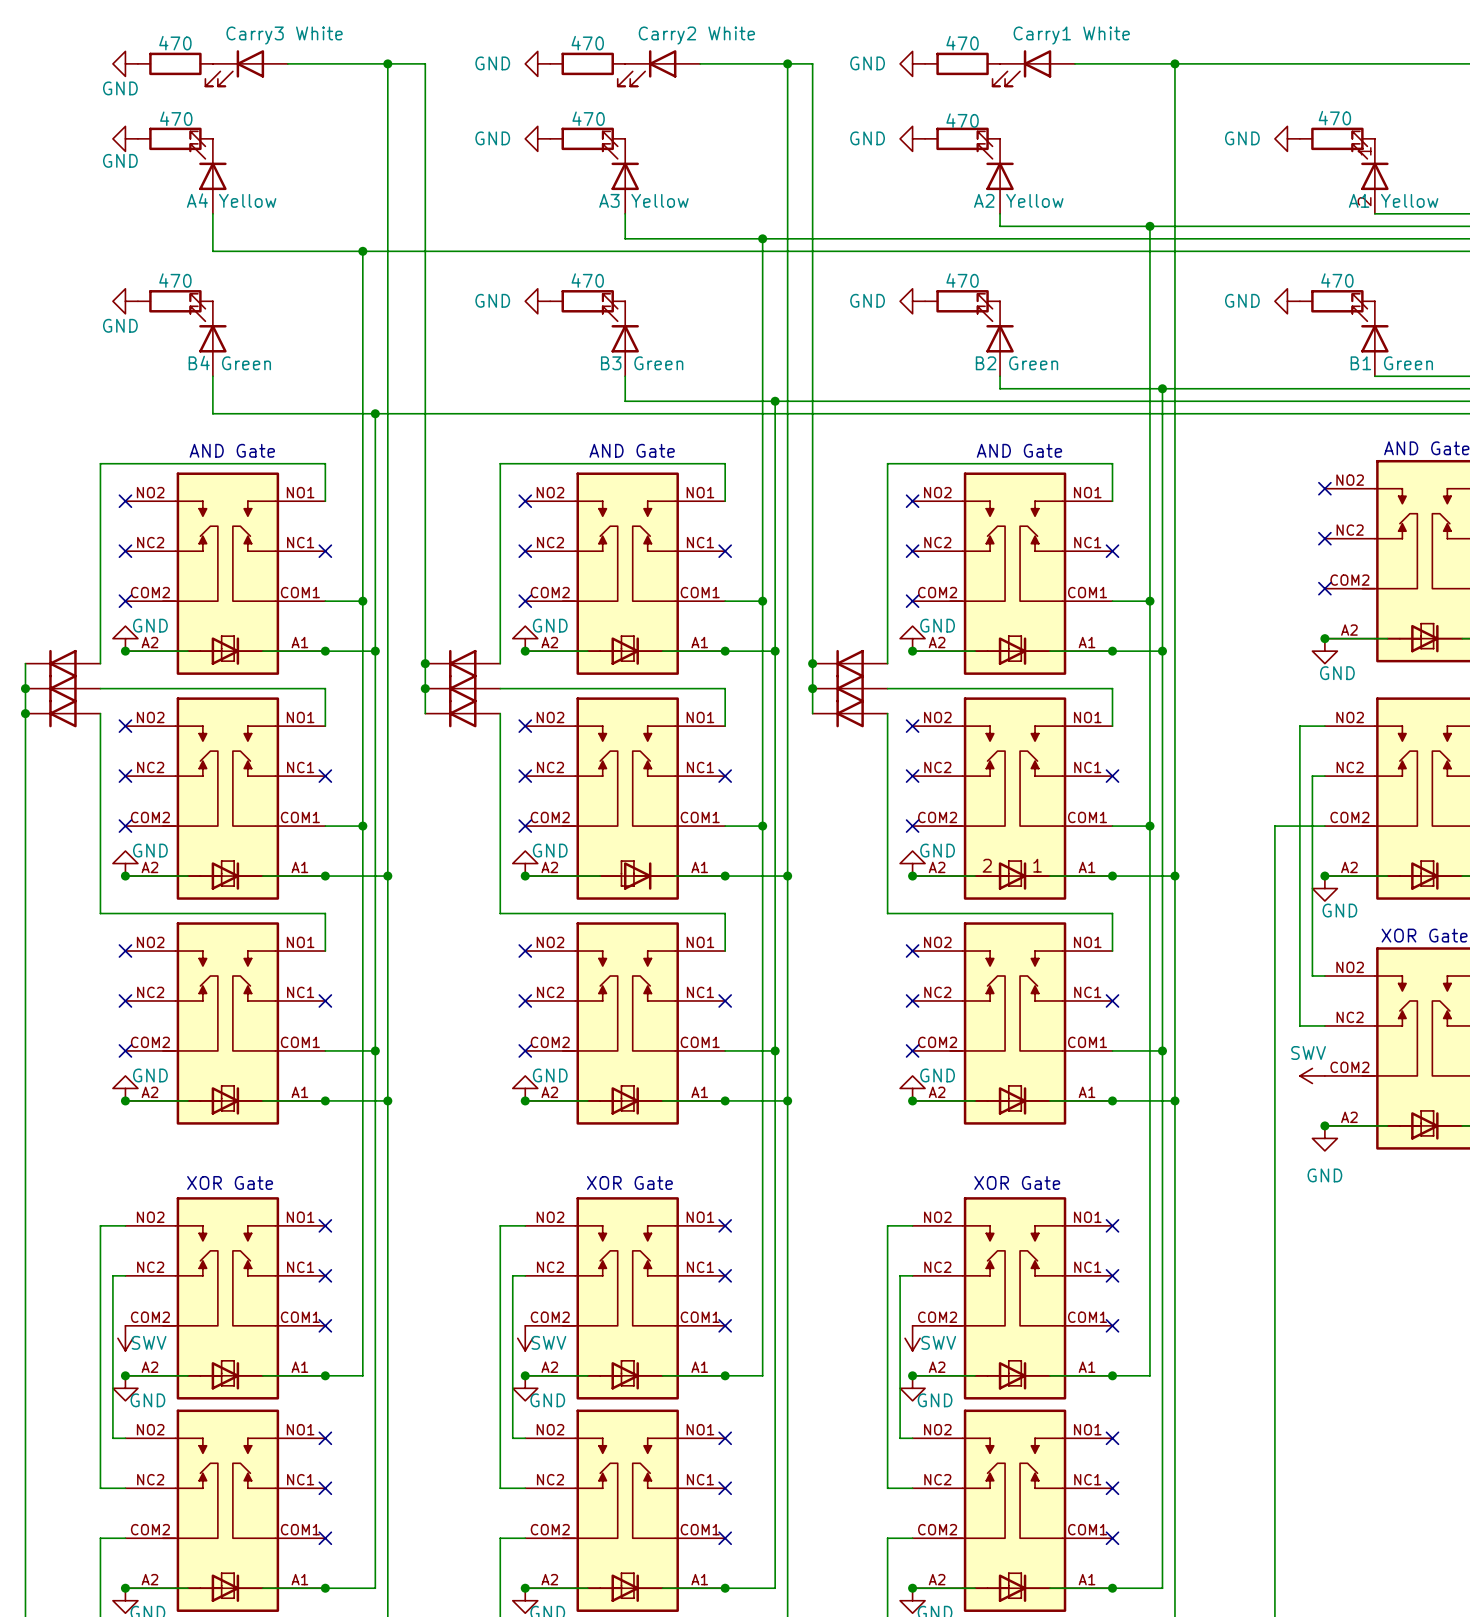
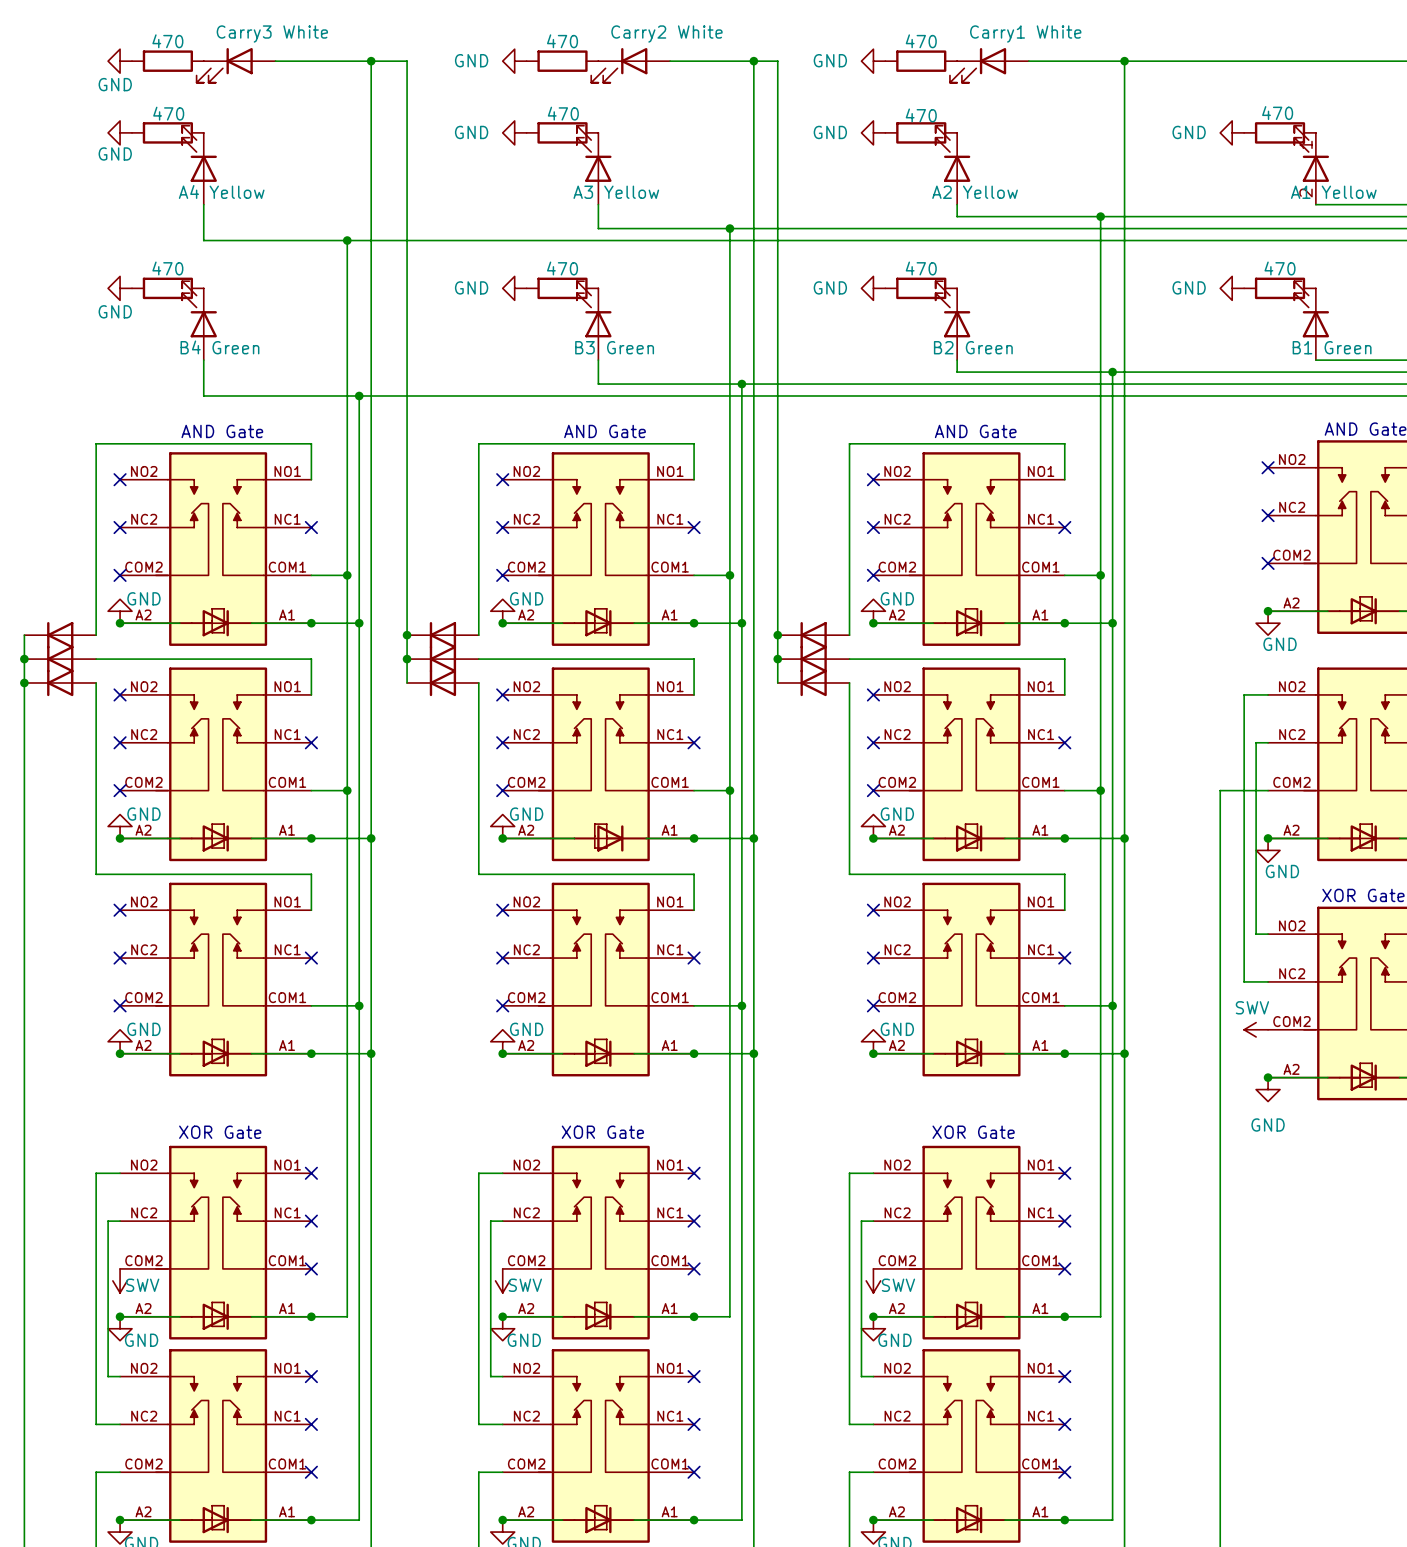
part pin number: 2 (987, 865) -> none
part pin number: 1 (1037, 865) -> none

